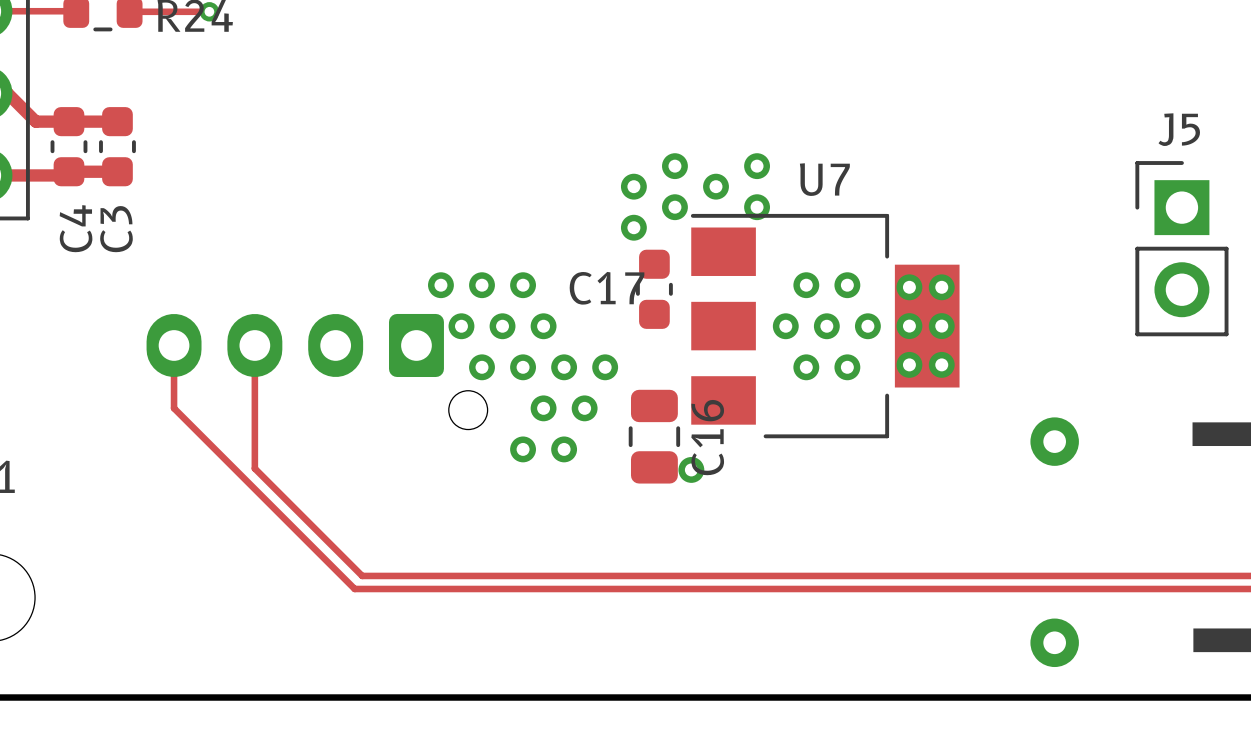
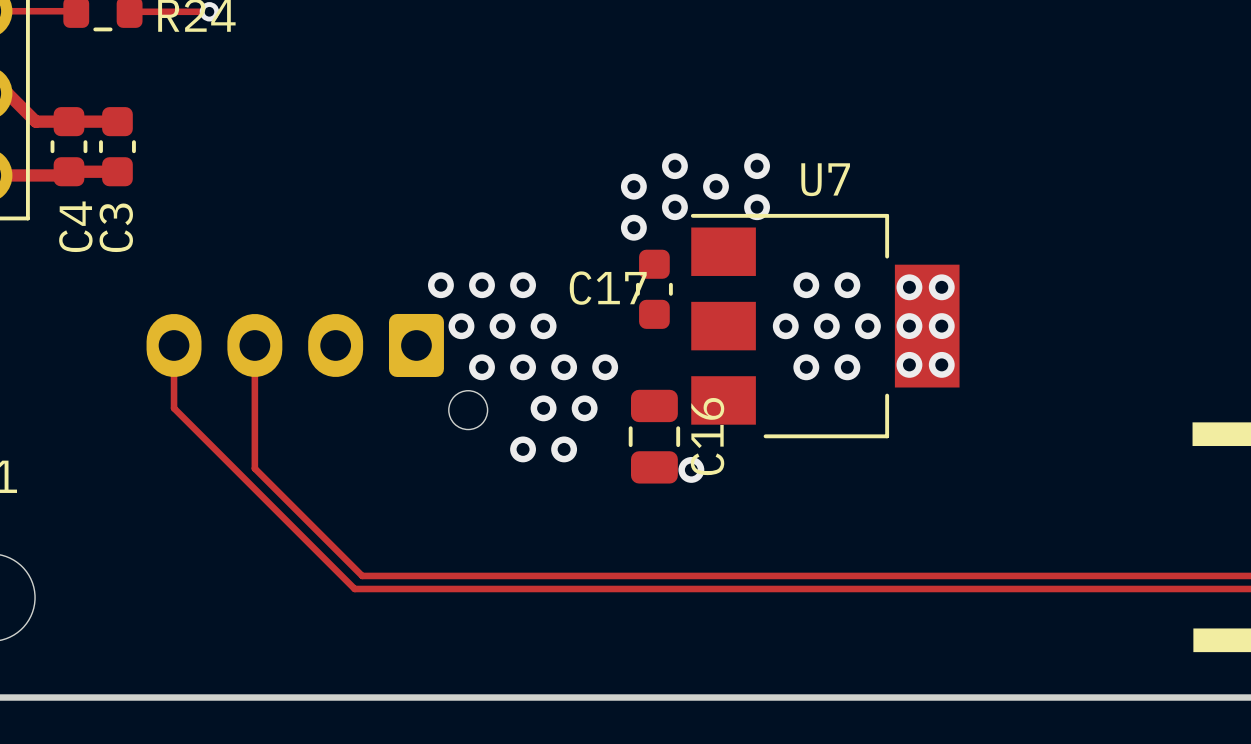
J5: (1181, 248) -> none
via: (1054, 441) -> none
via: (1054, 642) -> none

